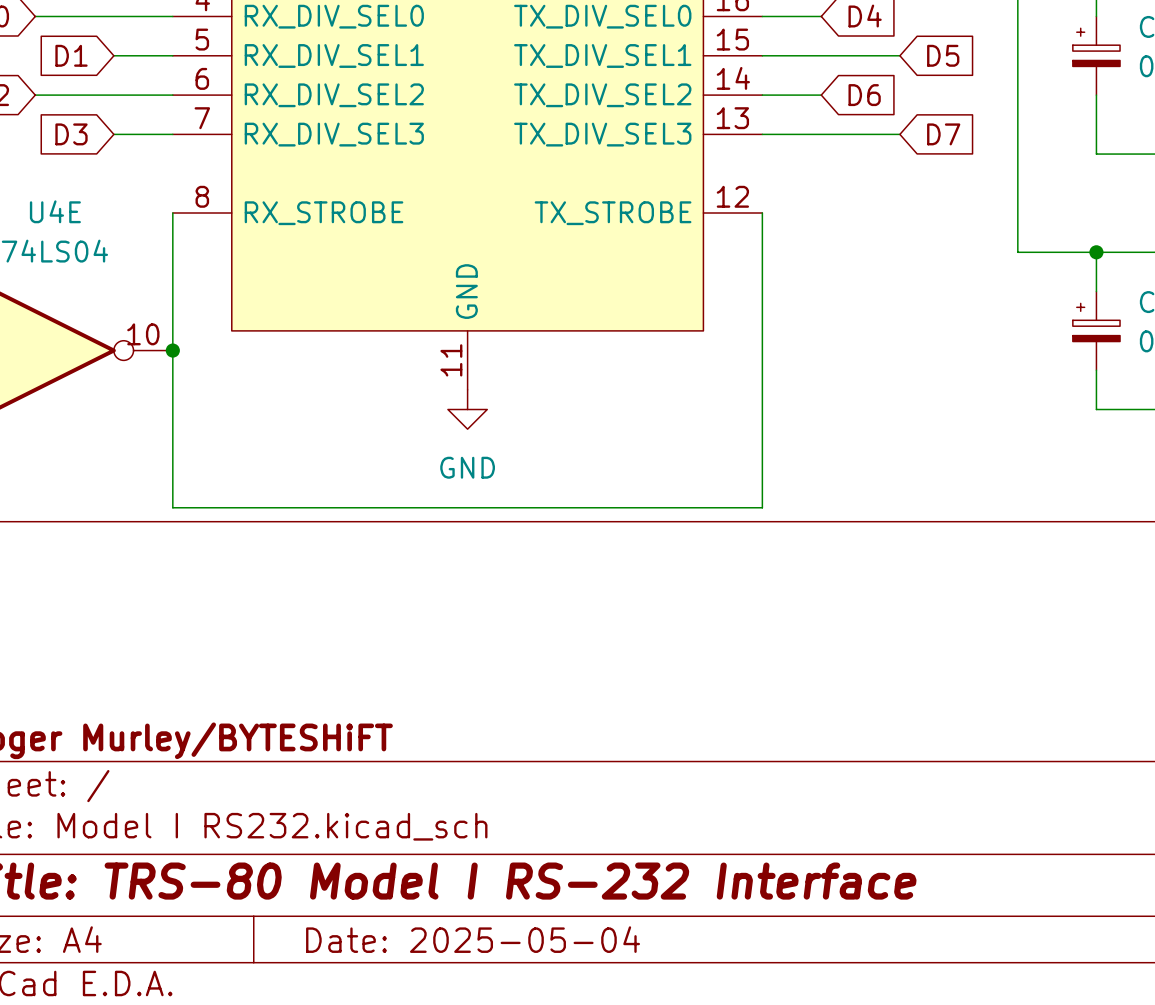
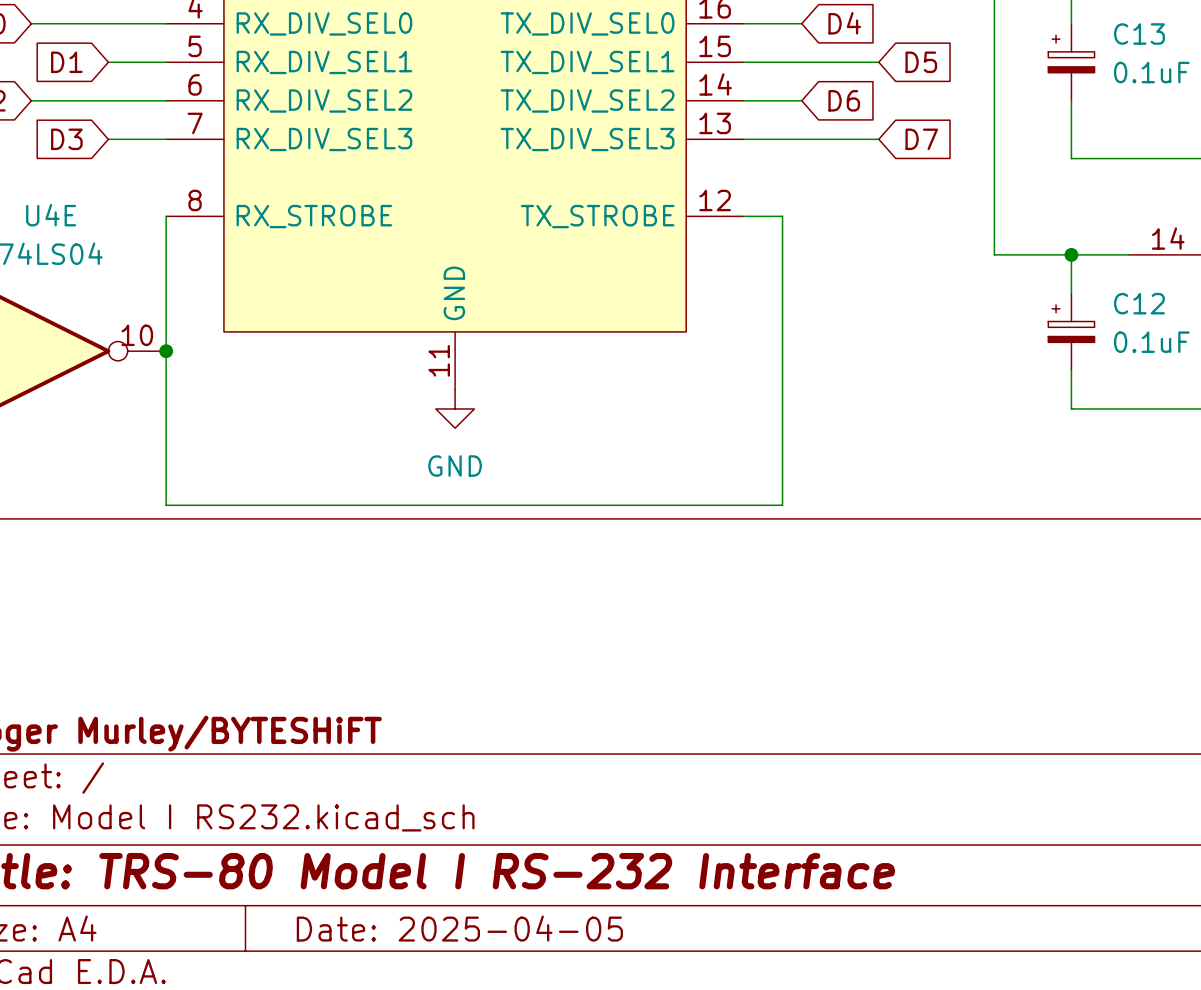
wire: (762, 213) (762, 507) -> (744, 216) (782, 216) (782, 505) (744, 505)
title block: Date: 2025-05-04 (473, 939) -> Date: 2025-04-05 (459, 928)

